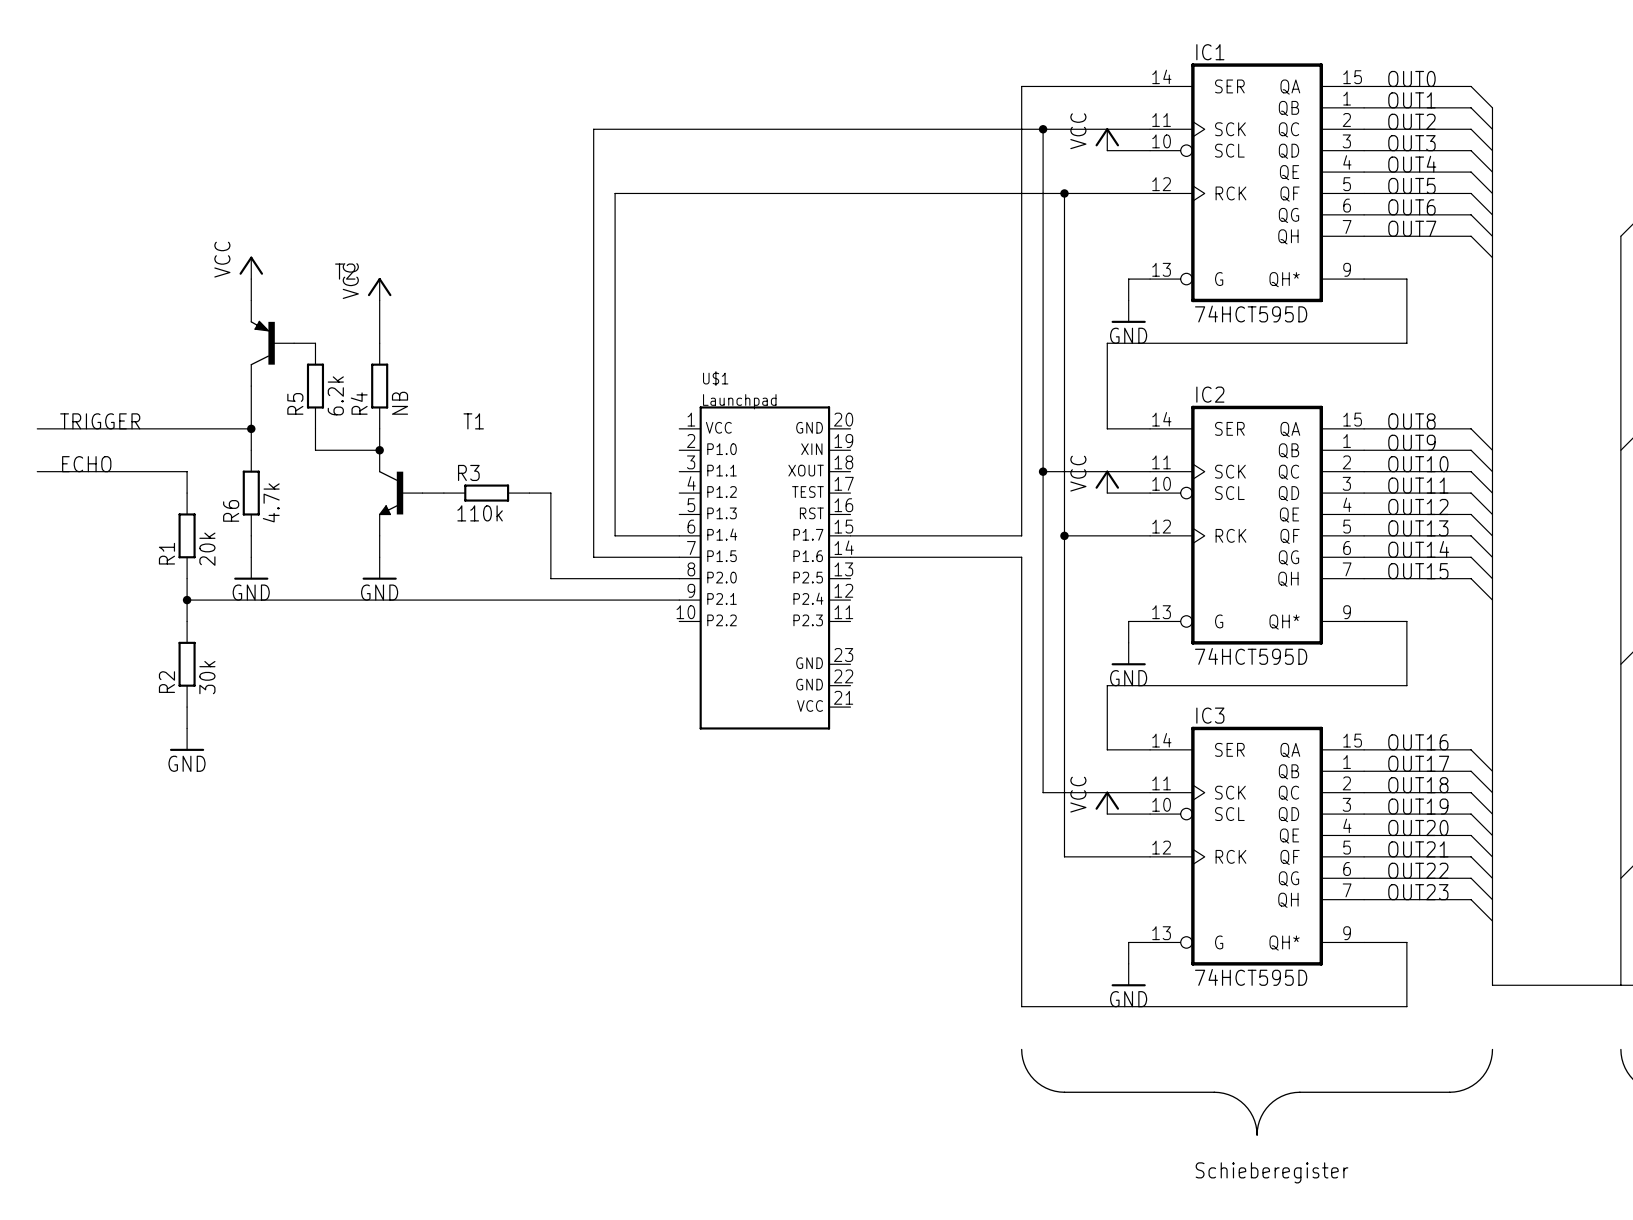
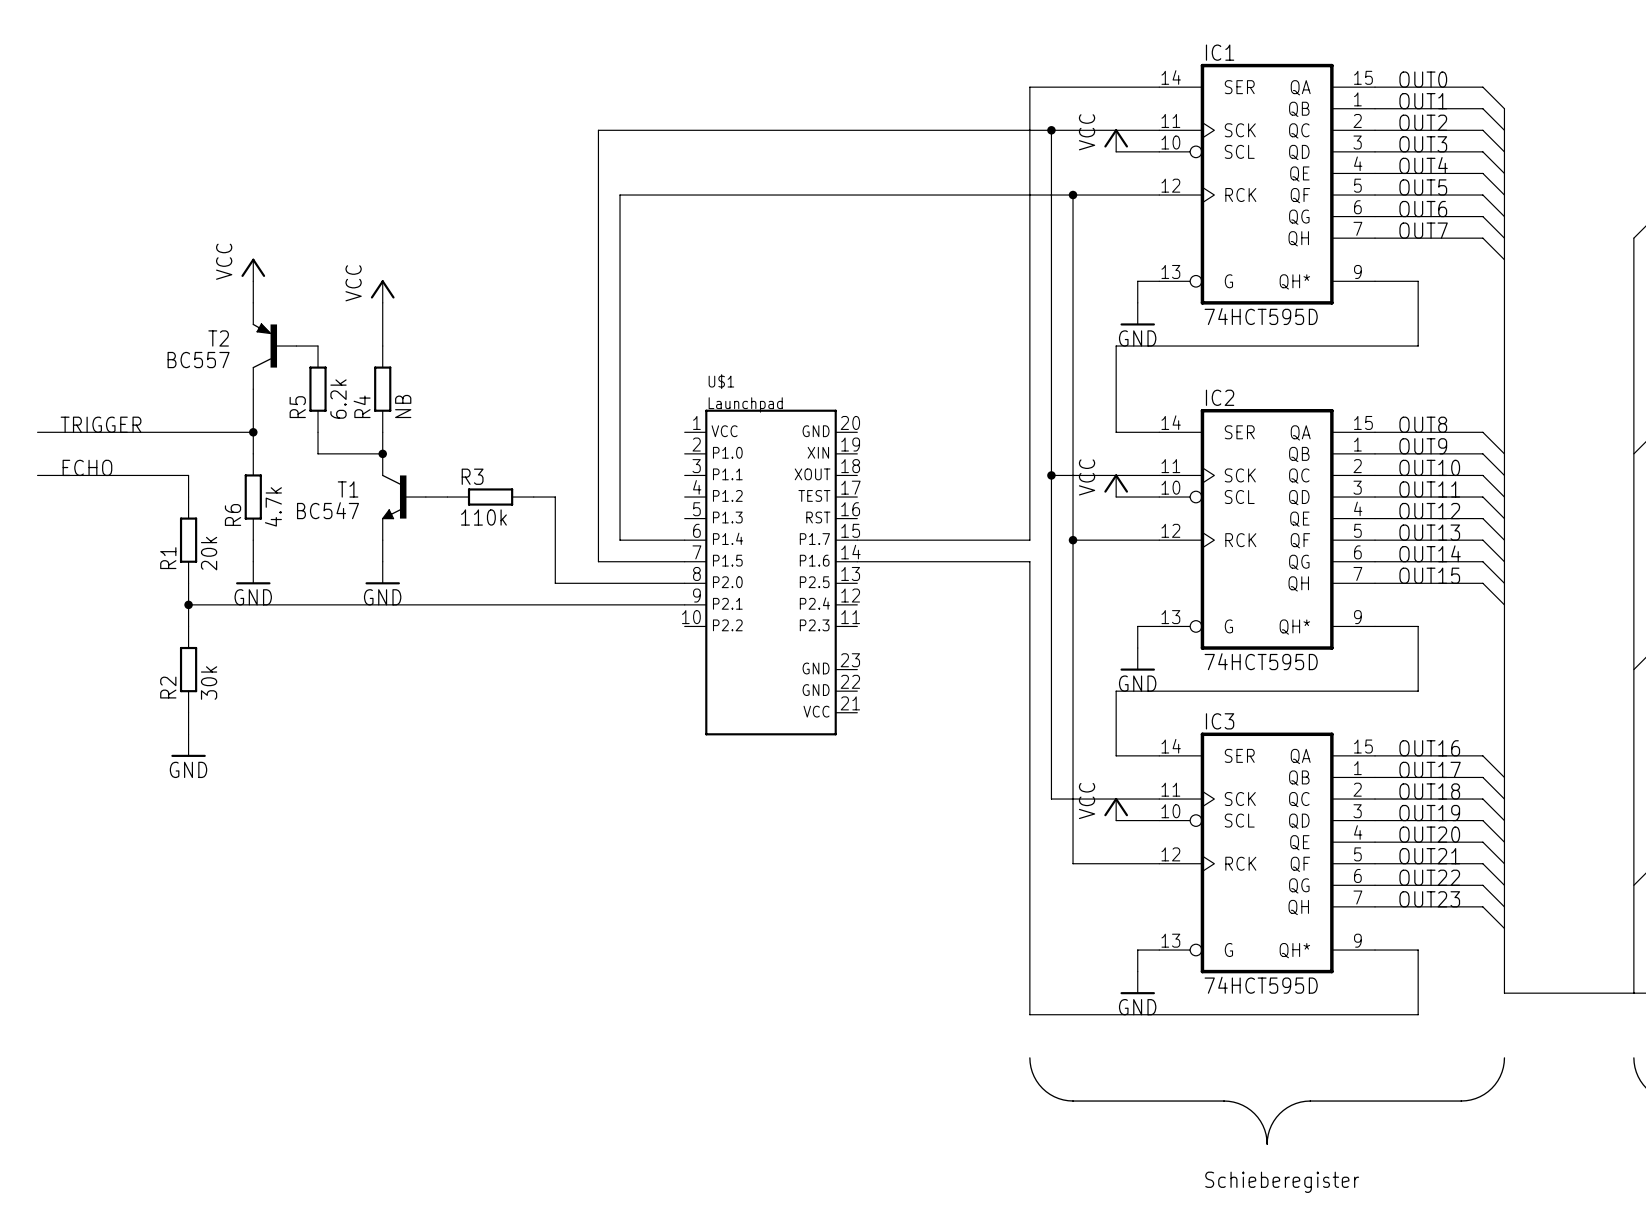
T2 name position: T2 (345, 271) -> T2 (218, 338)
T2 value: none -> BC557 (198, 360)
T1 name position: T1 (473, 421) -> T1 (348, 489)
T1 value: none -> BC547 (328, 510)

